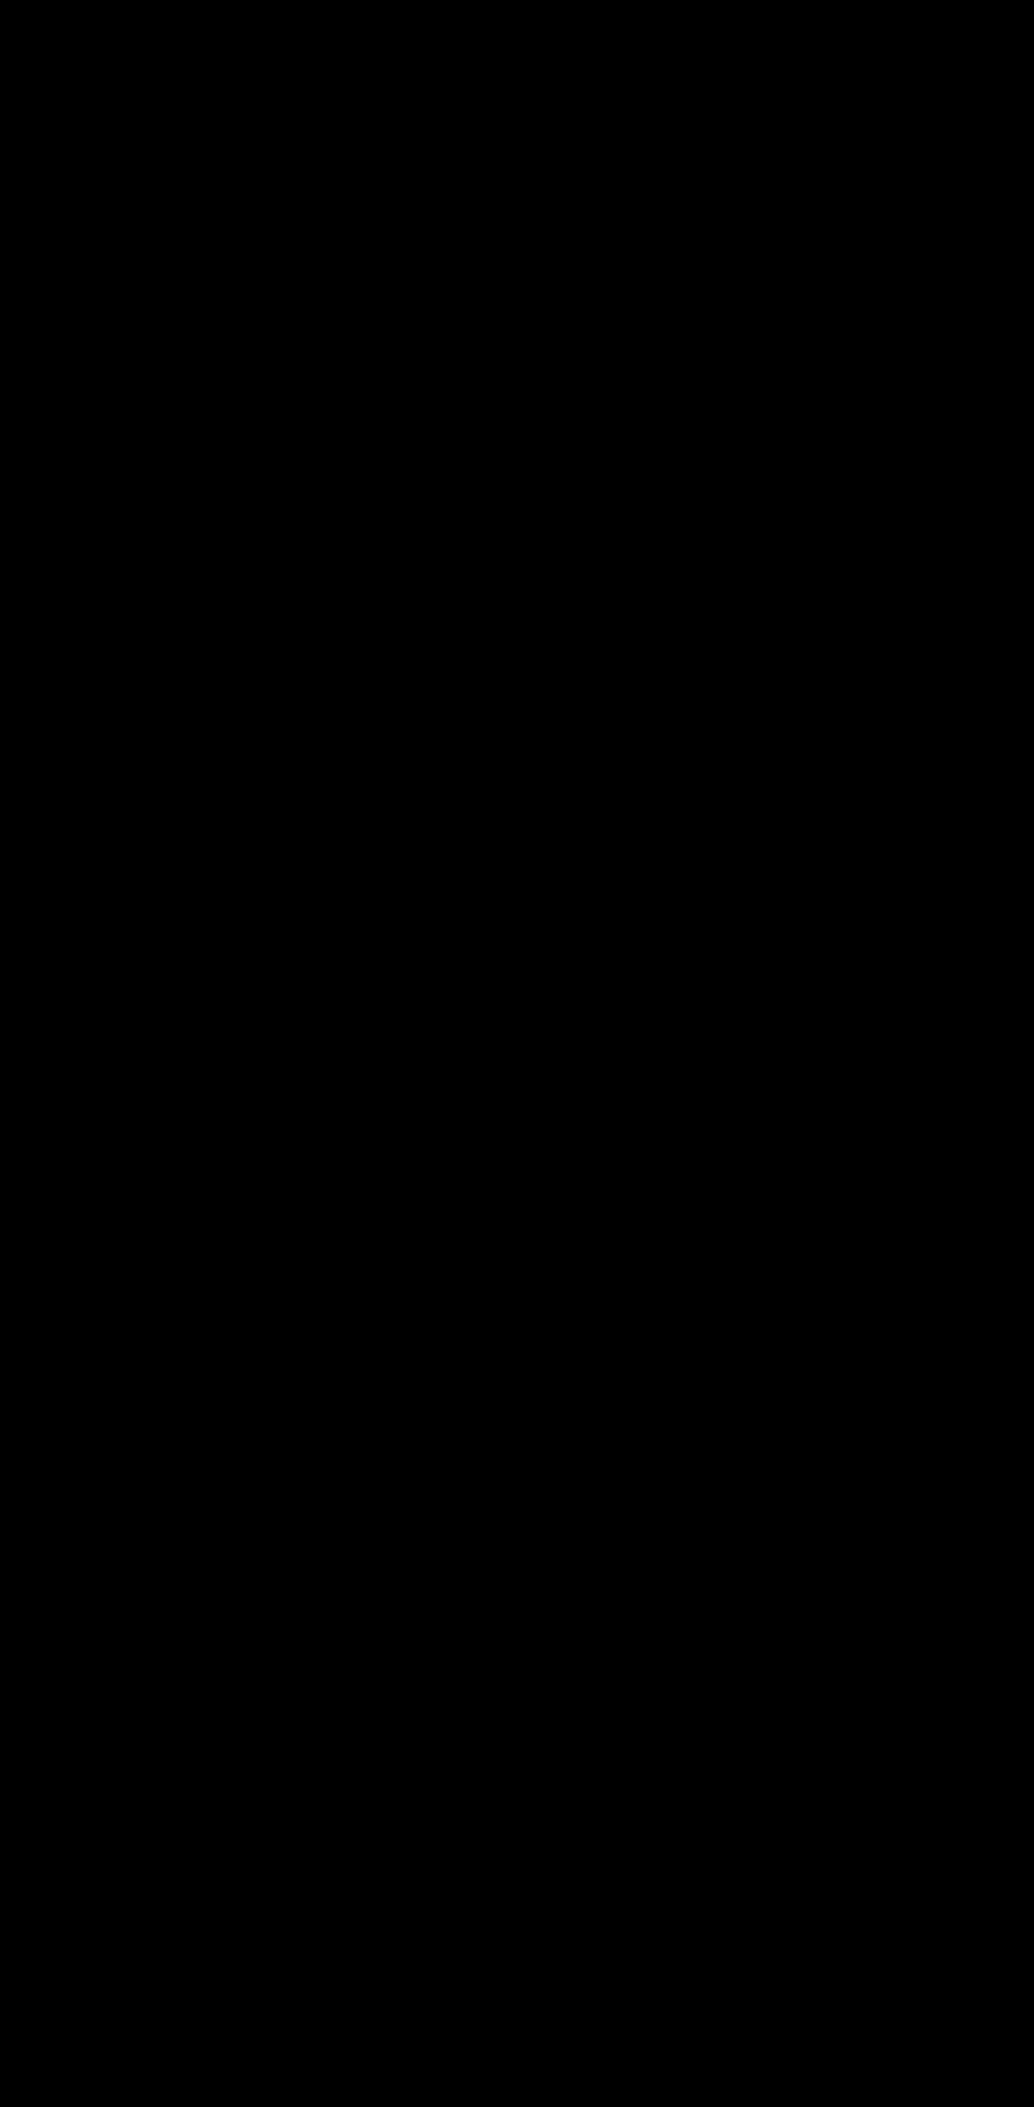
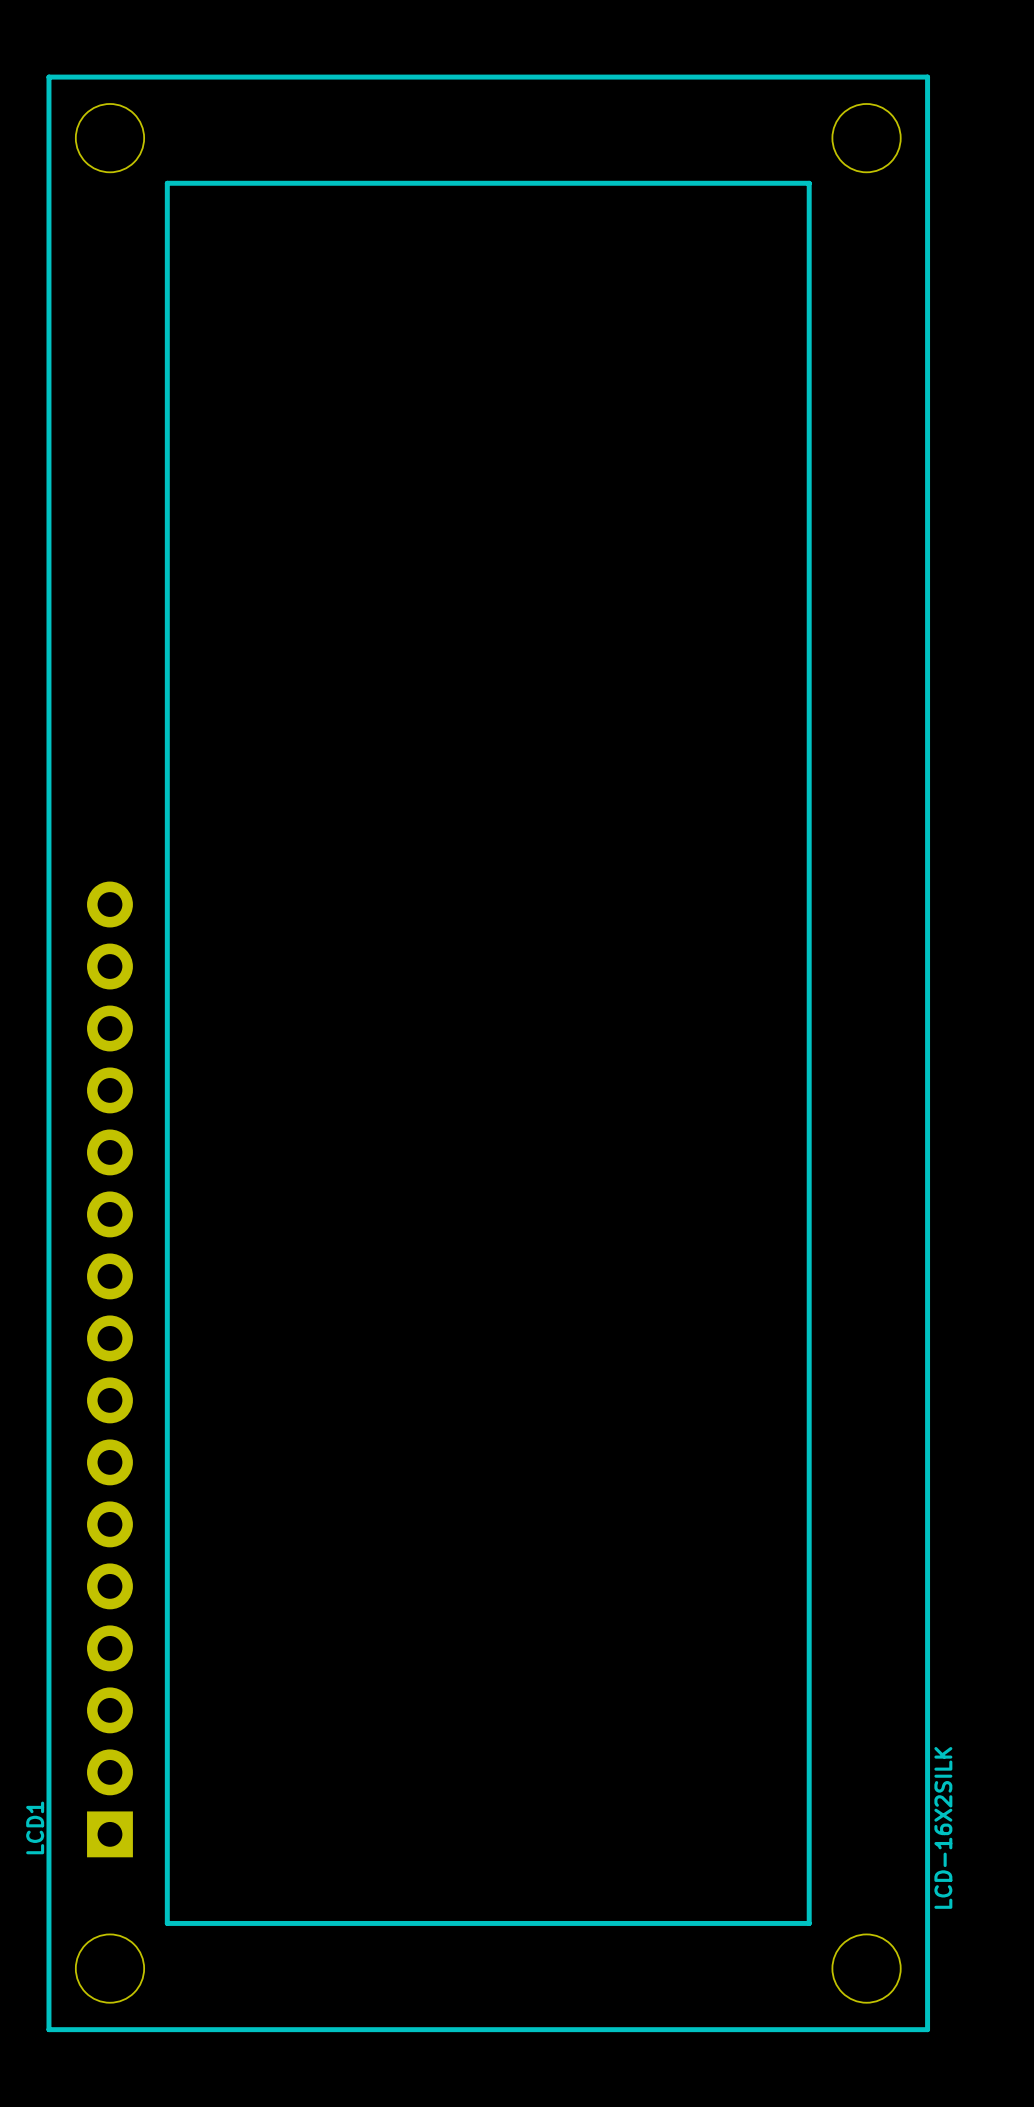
LCD1: none -> LCD-16X2SILK (488, 1053)

